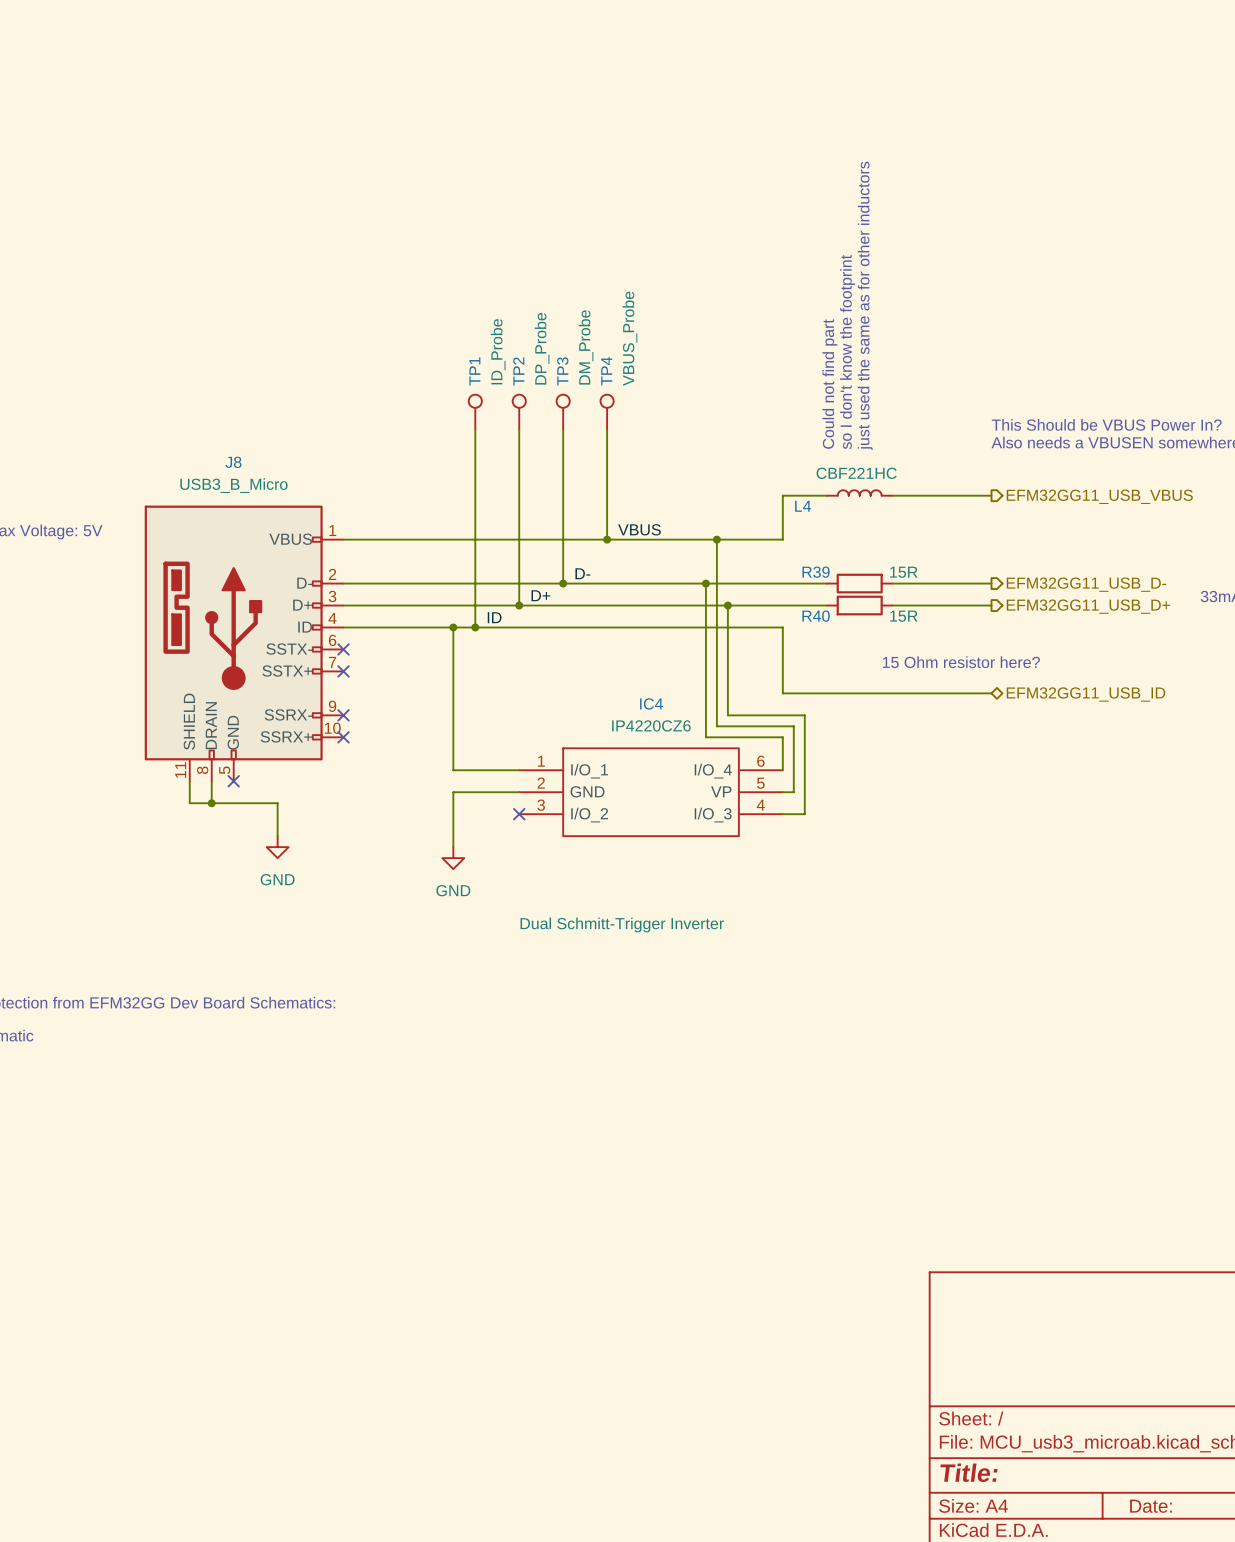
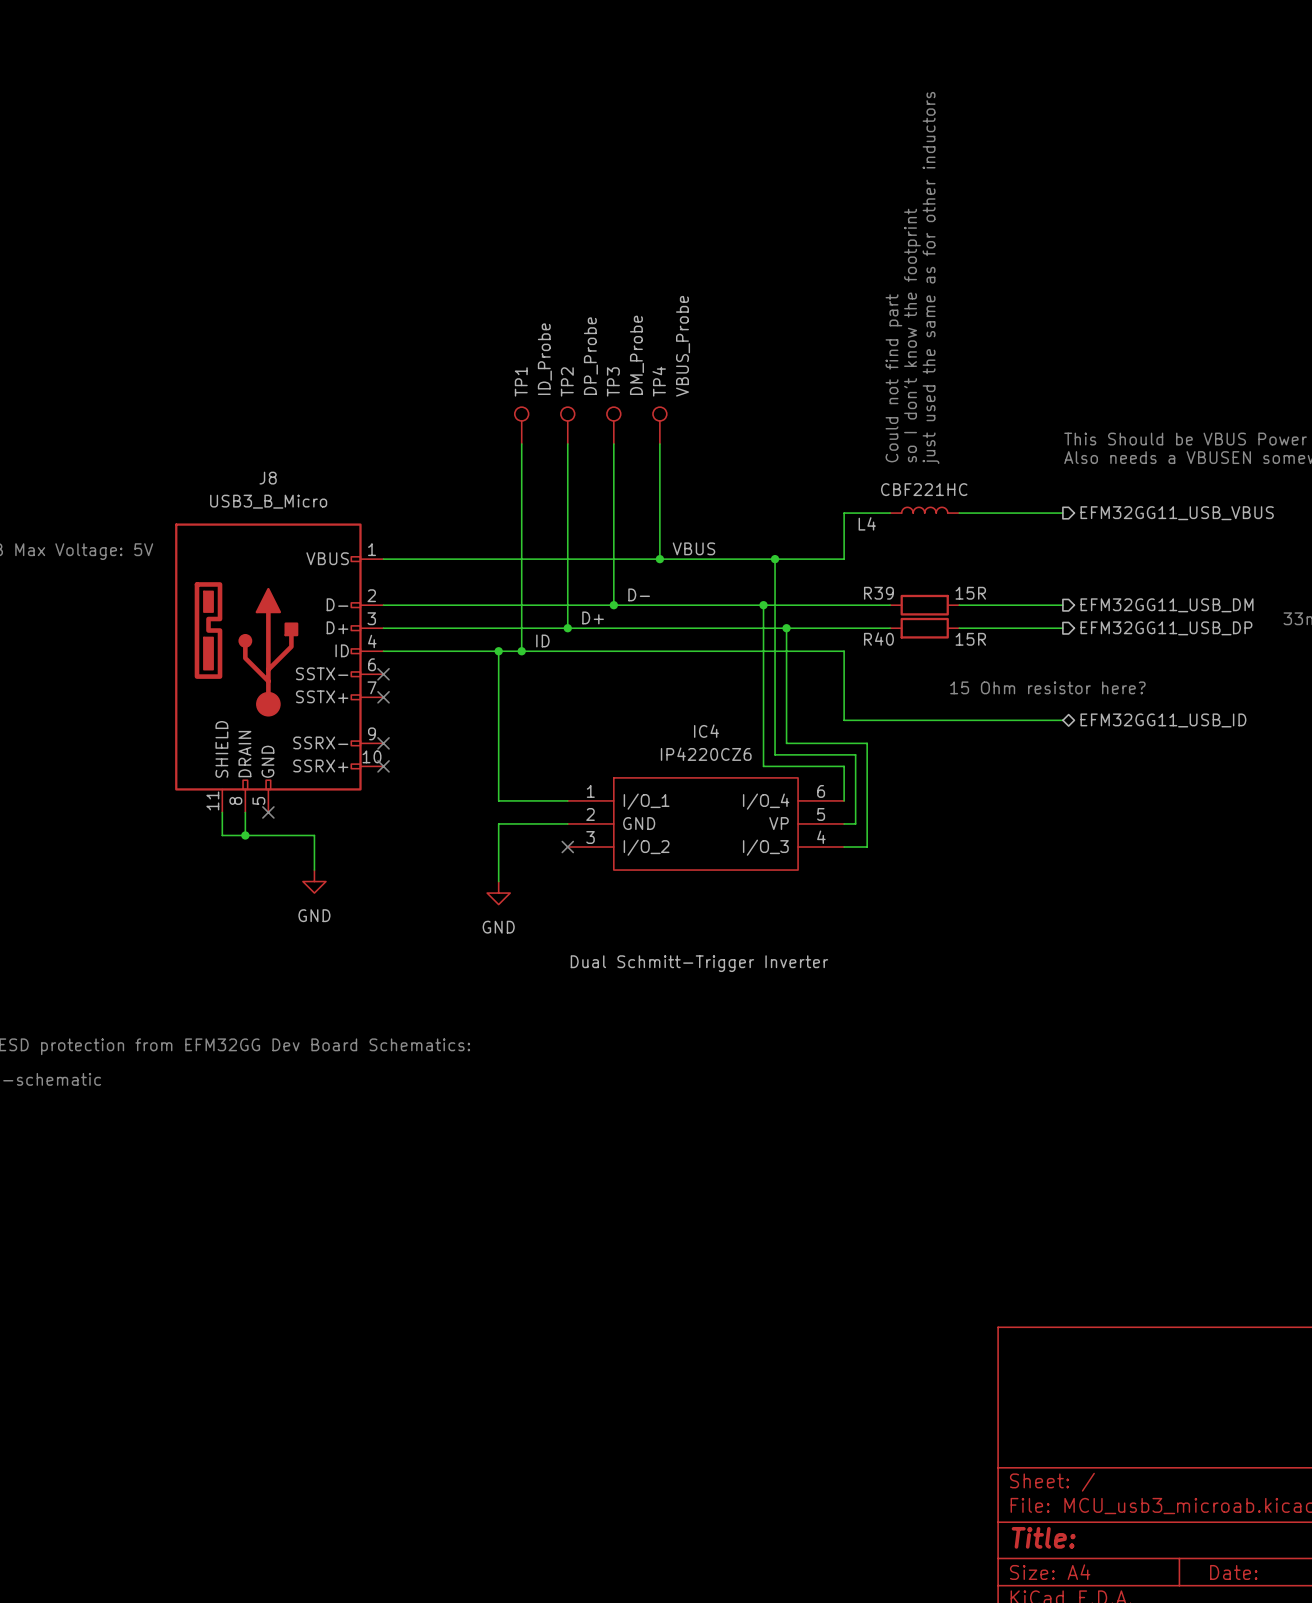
hierarchical label: EFM32GG11_USB_D- (1086, 584) -> EFM32GG11_USB_DM (1166, 605)
hierarchical label: EFM32GG11_USB_D+ (1088, 606) -> EFM32GG11_USB_DP (1166, 628)

